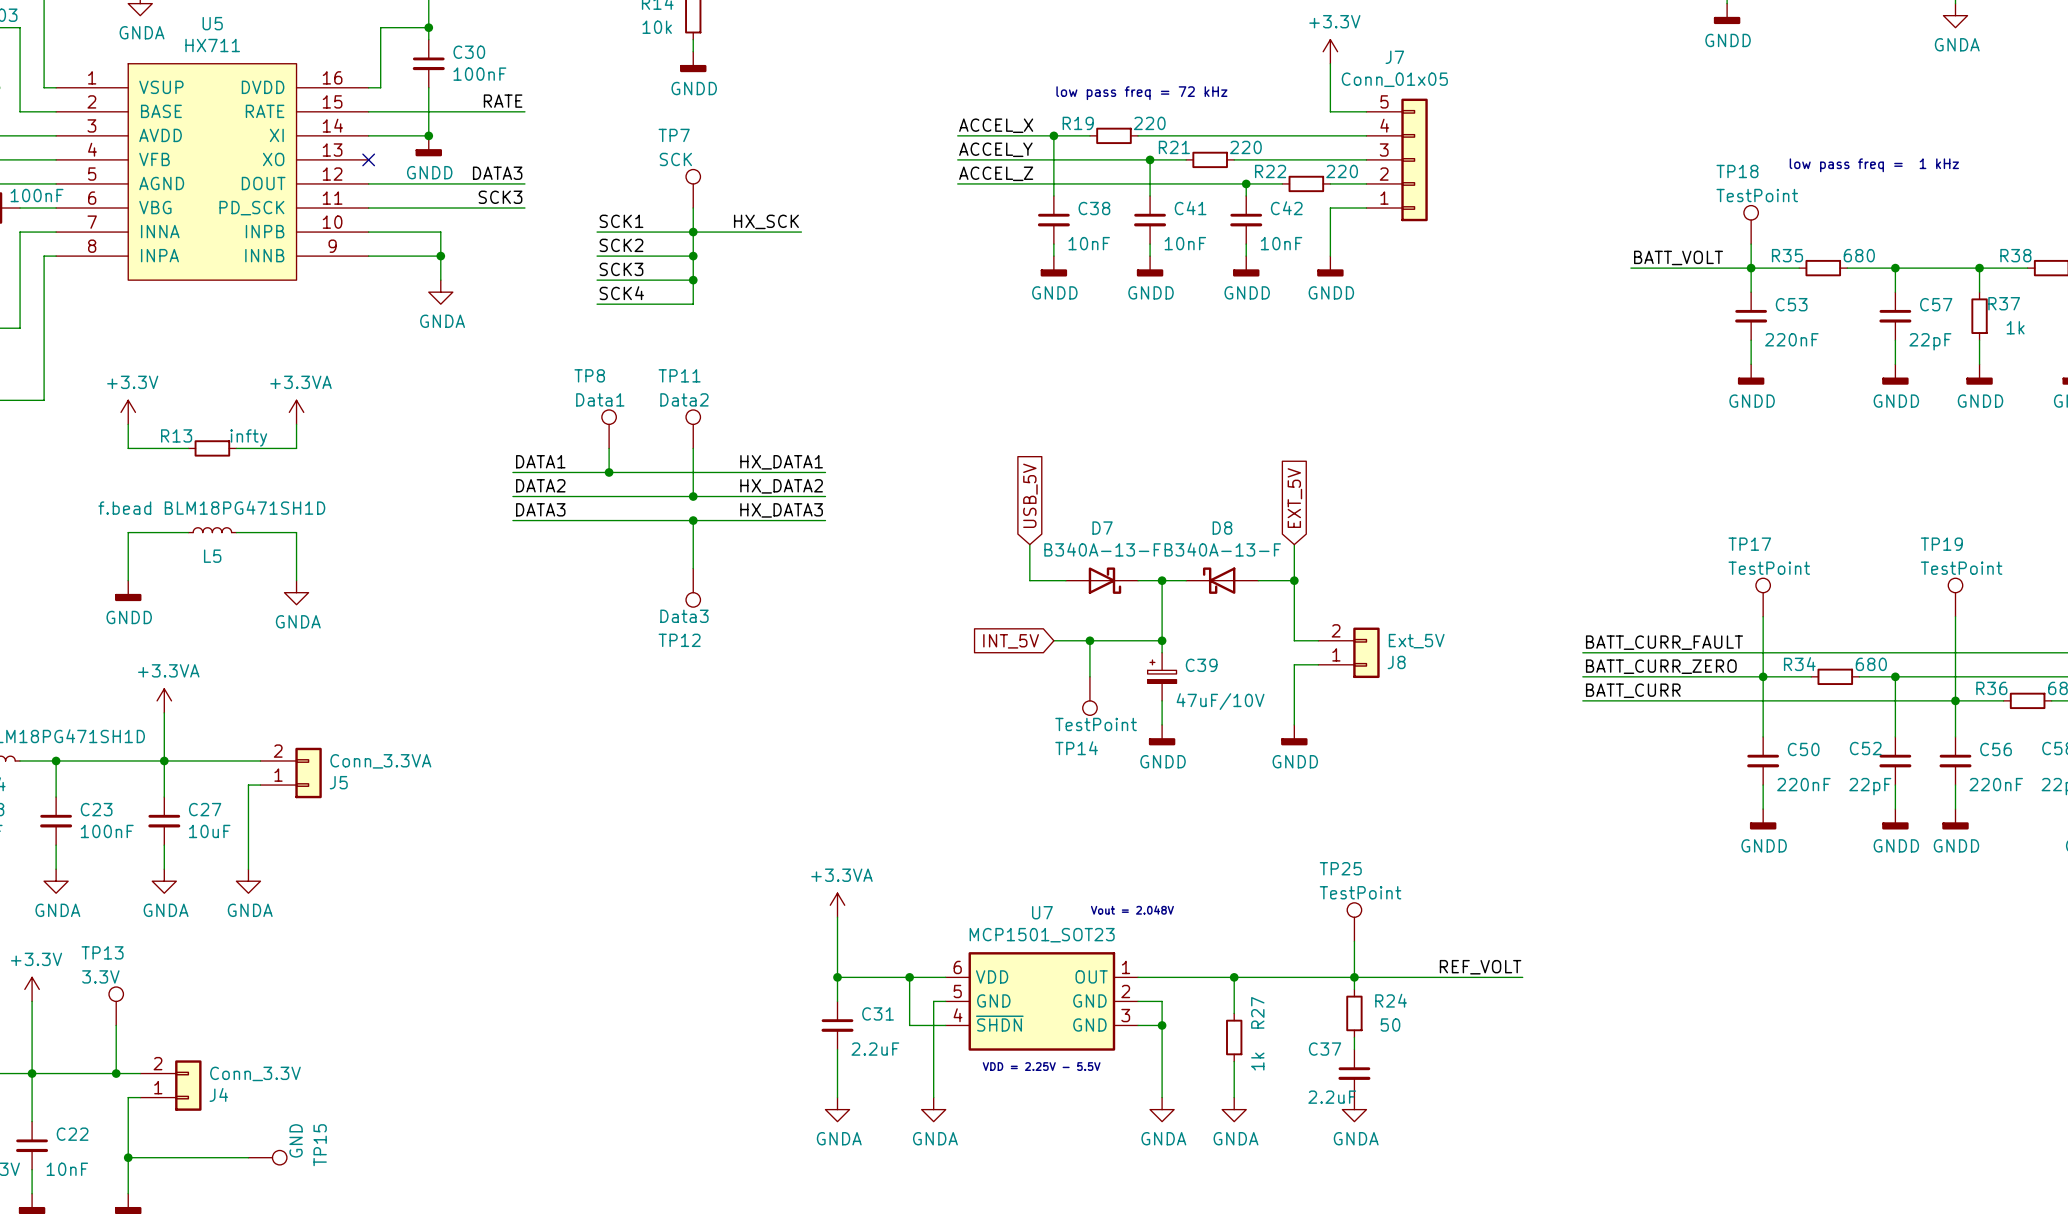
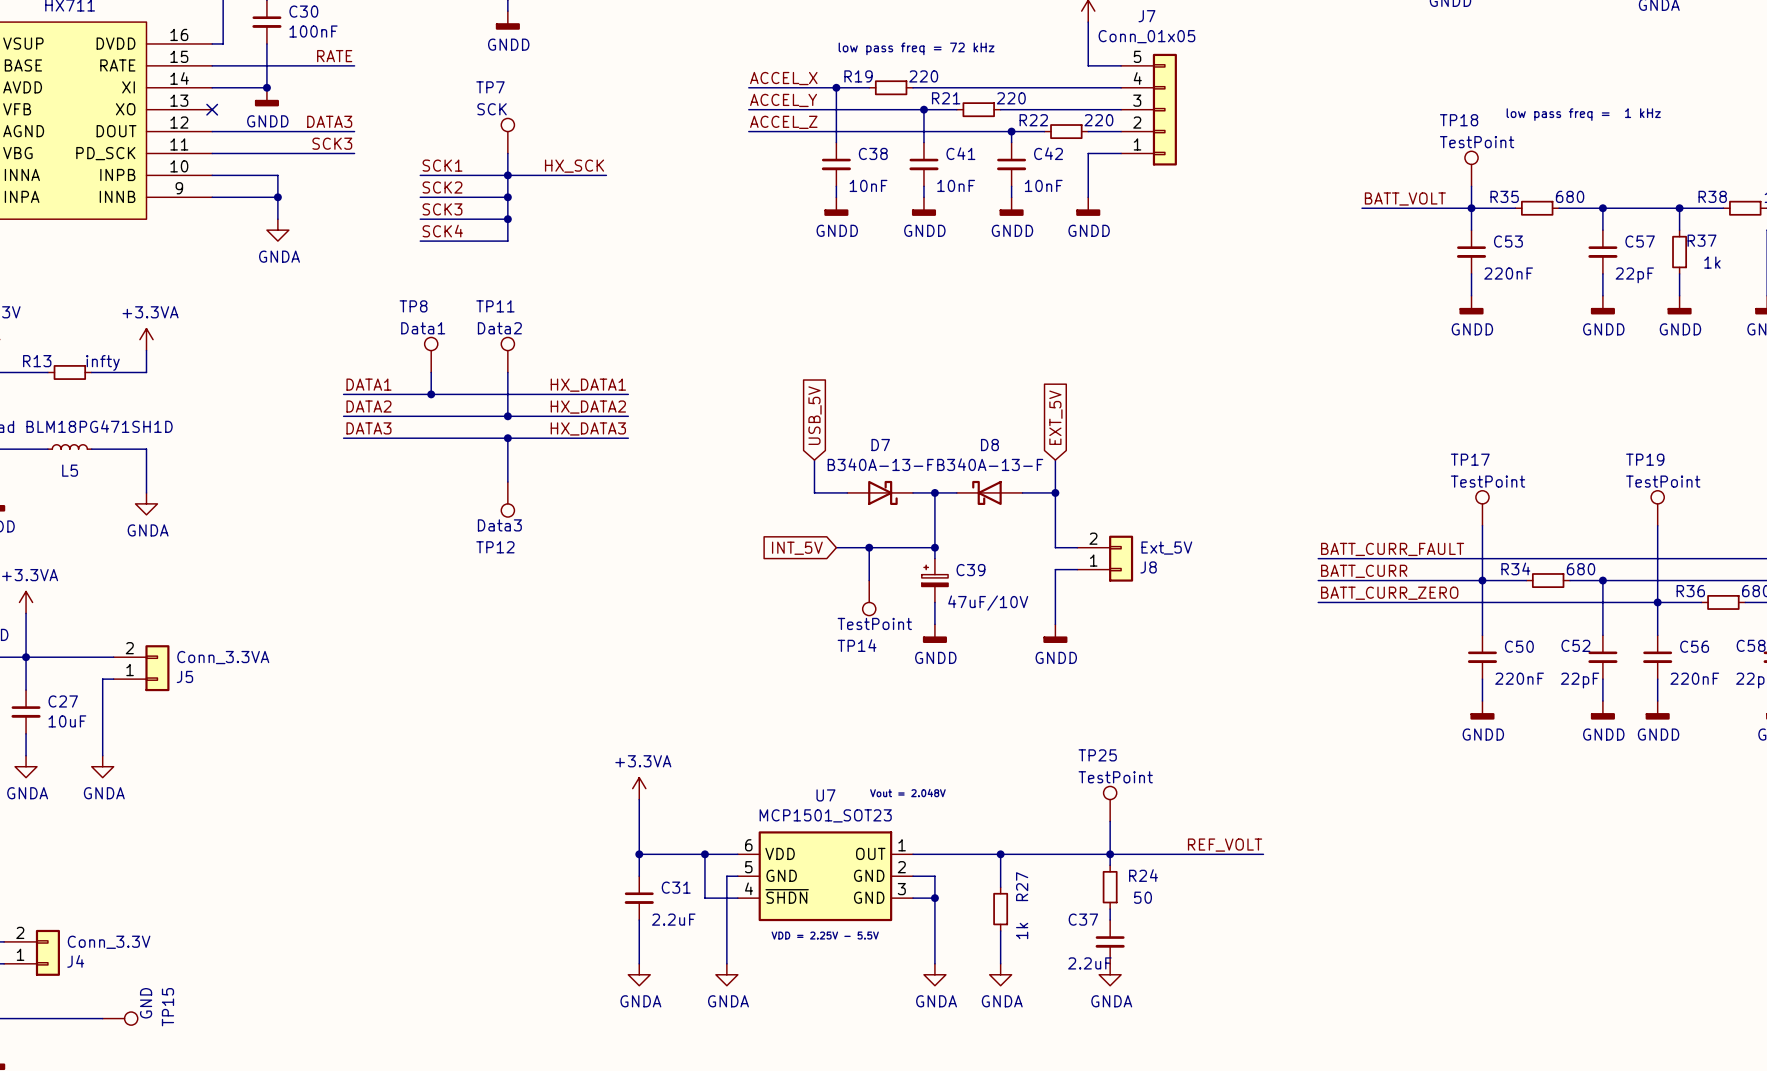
label: BATT_CURR_ZERO (1661, 666) -> BATT_CURR (1364, 571)
label: BATT_CURR (1633, 690) -> BATT_CURR_ZERO (1389, 593)

